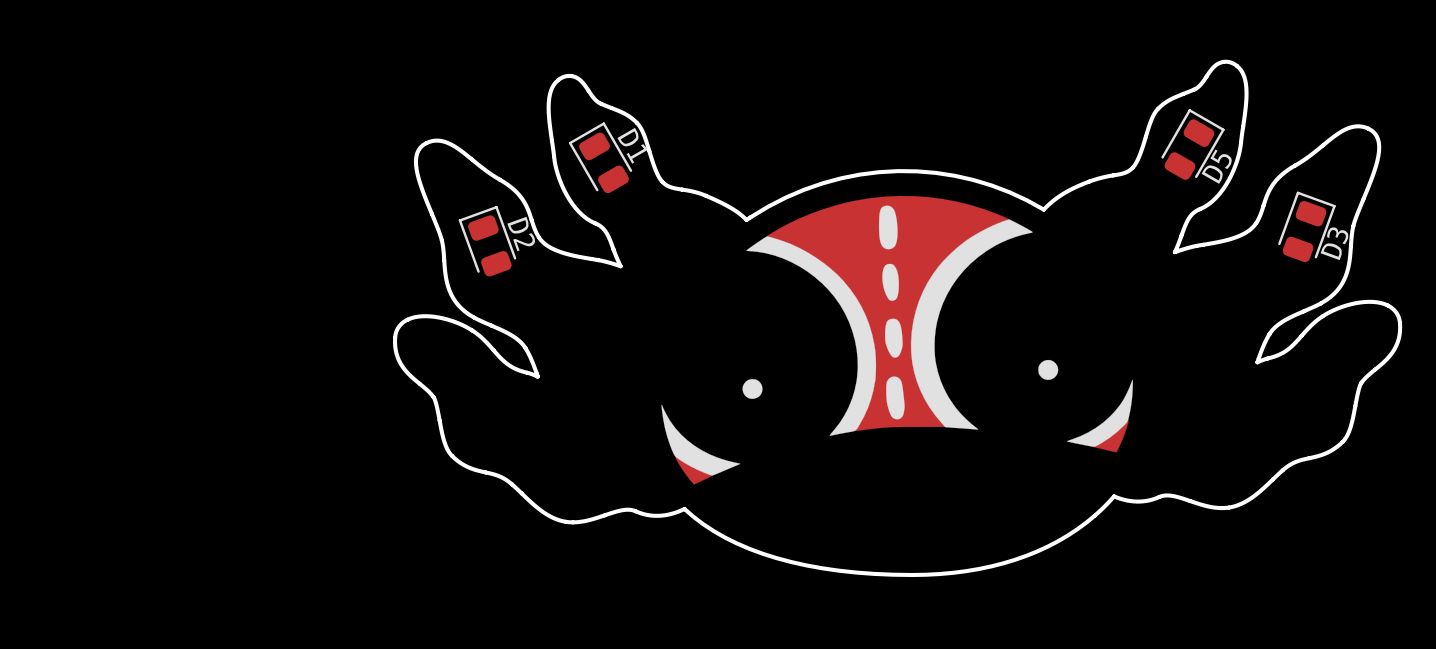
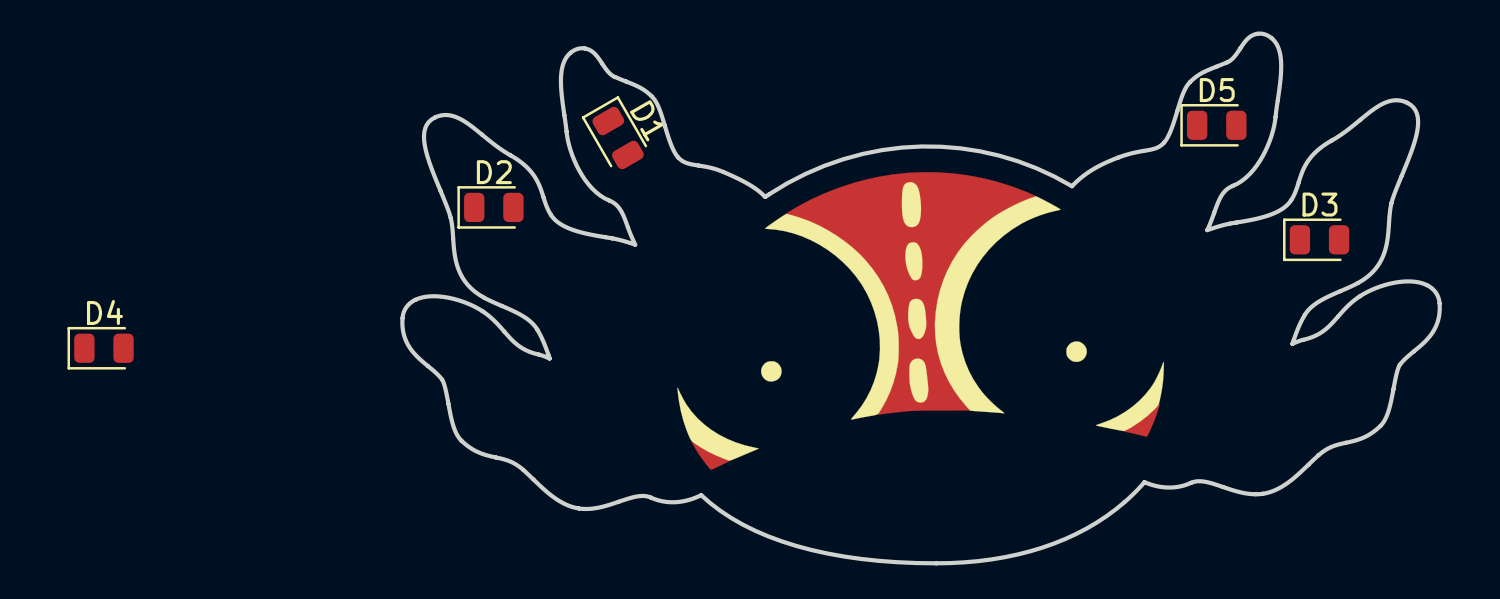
D5 rotation: 0° (1192, 144) -> 120° counterclockwise (1213, 125)
D3 rotation: 0° (1306, 226) -> 110° counterclockwise (1316, 239)
D3 position: (1306, 226) -> (1316, 239)
D2 rotation: 0° (487, 241) -> 70° counterclockwise (490, 207)
D4: none -> (100, 348)

